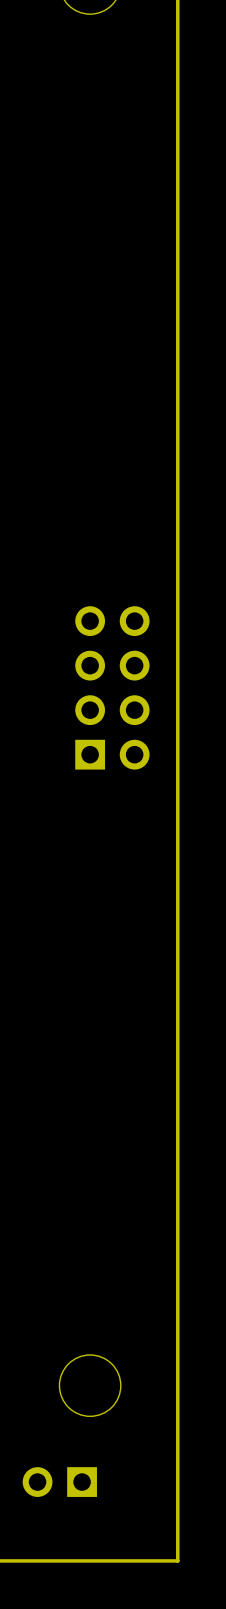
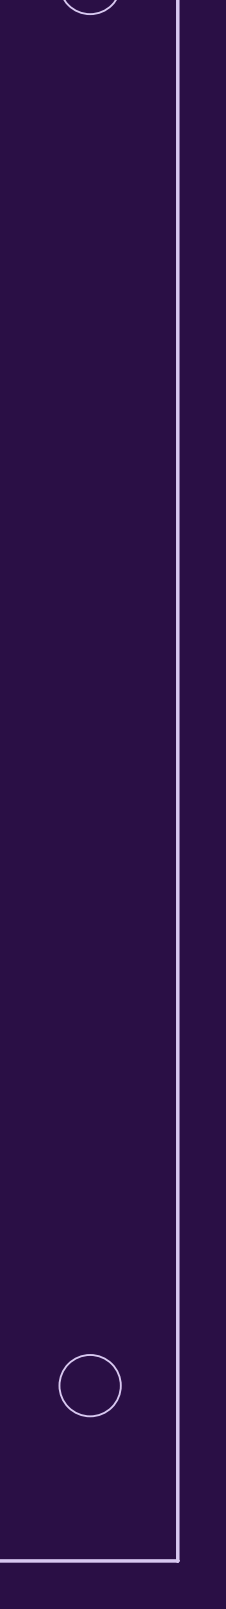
part: (112, 687) -> none
part: (59, 1482) -> none

